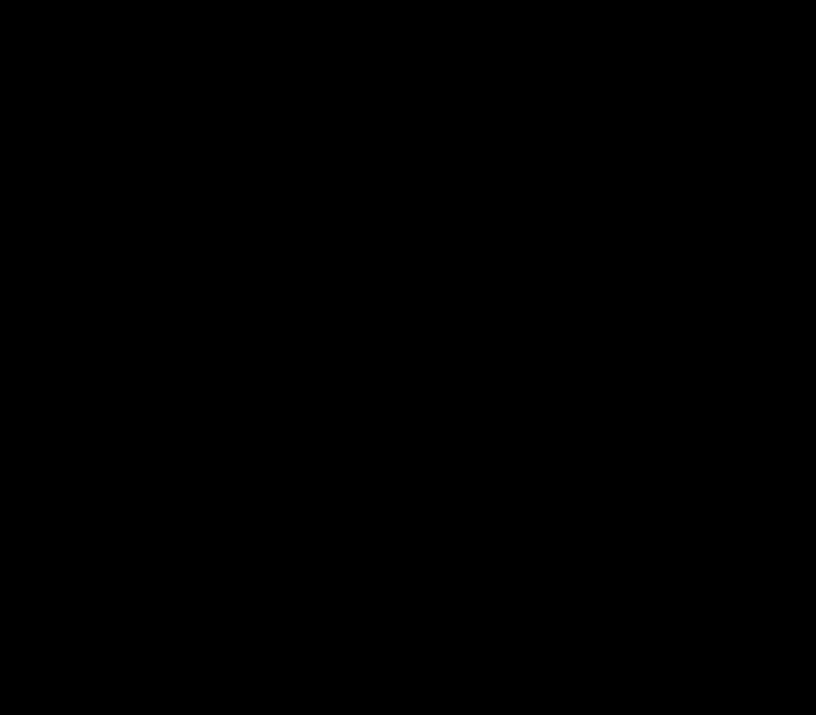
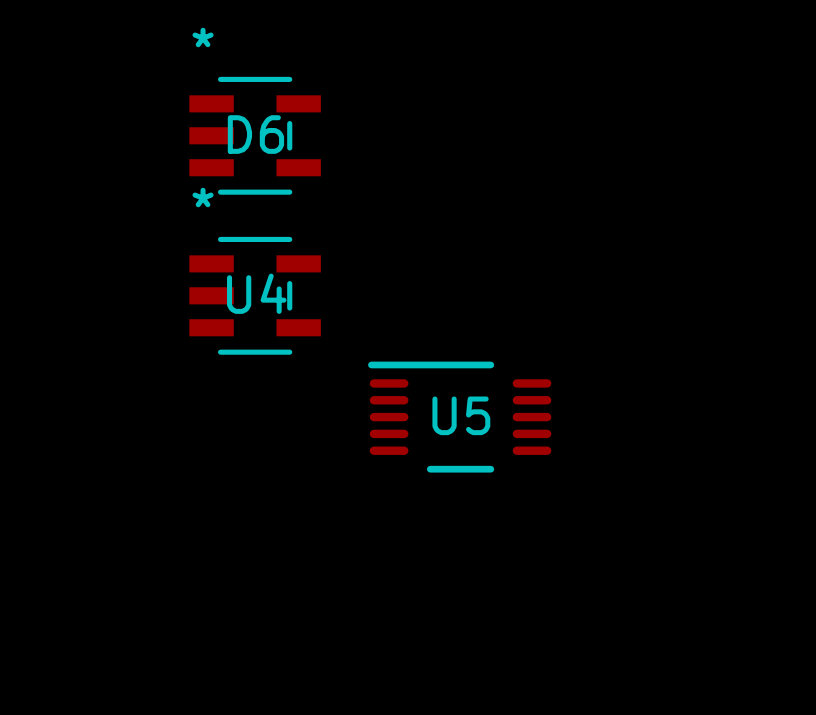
D6: none -> (255, 135)
U4: none -> (255, 295)
U5: none -> (459, 417)

